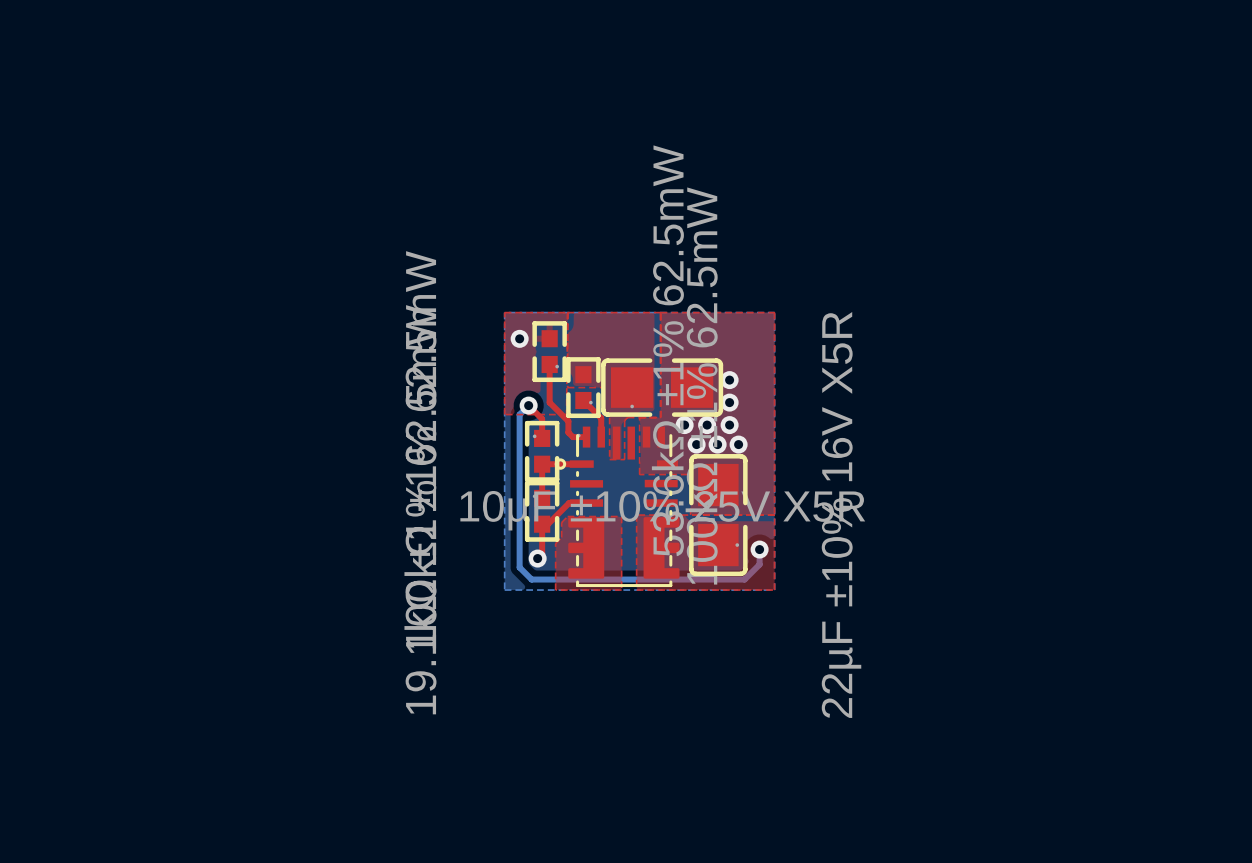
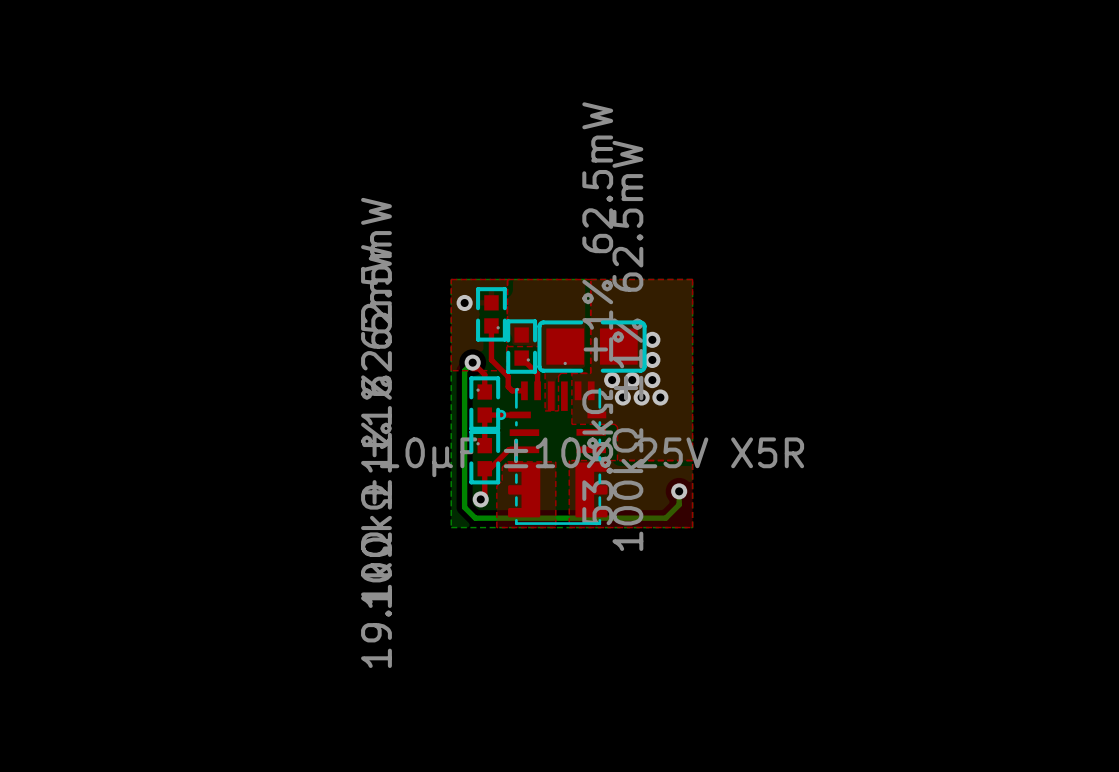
part: 22µF ±10% 16V X5R (718, 515) -> none

